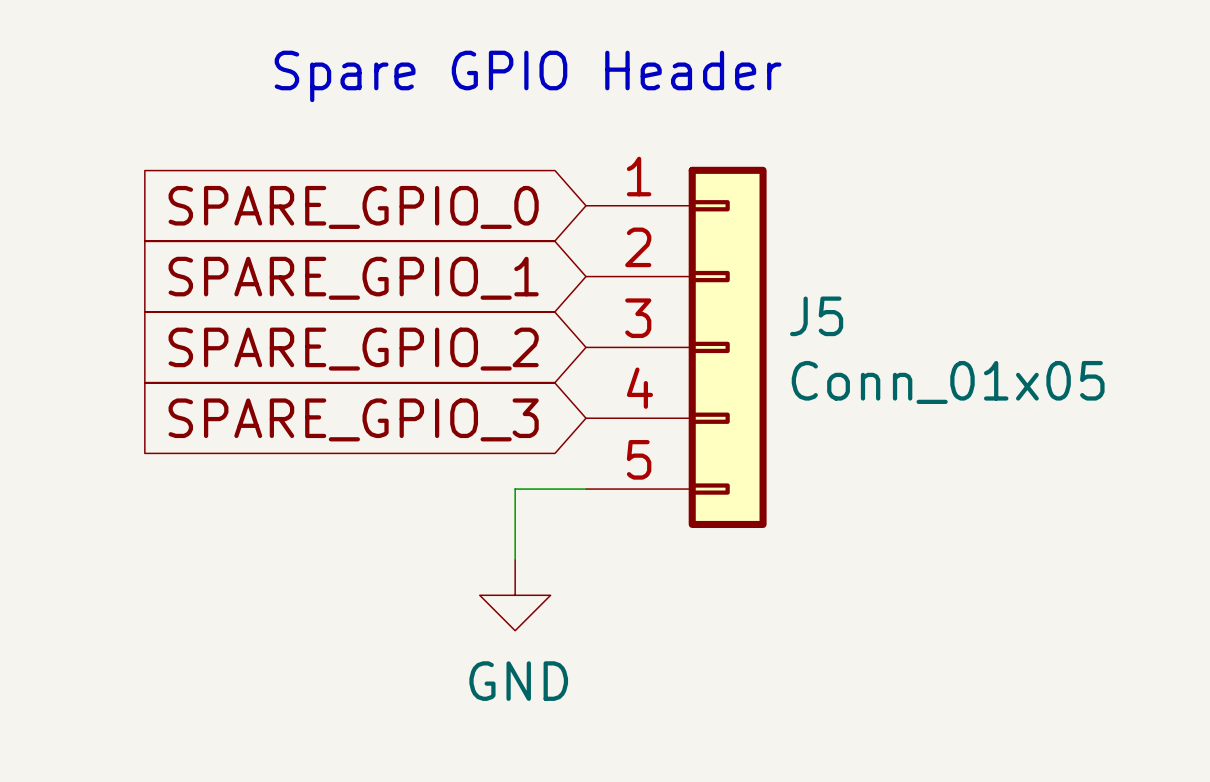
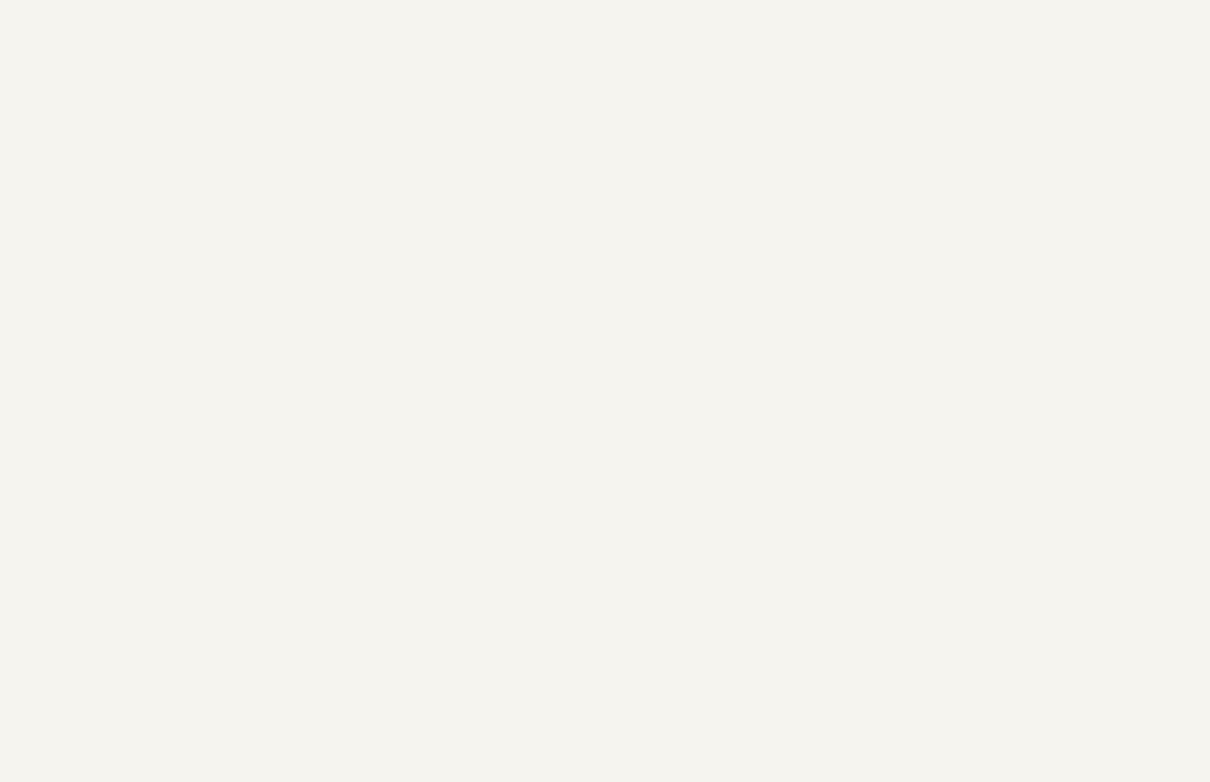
text: Spare GPIO Header (528, 76) -> none
global label: SPARE_GPIO_0 (353, 207) -> none
global label: SPARE_GPIO_1 (353, 278) -> none
J5: Conn_01x05 (676, 347) -> none
global label: SPARE_GPIO_2 (353, 349) -> none
global label: SPARE_GPIO_3 (353, 419) -> none
wire: (585, 489) (515, 489) (515, 559) -> none
power symbol: GND (515, 595) -> none

